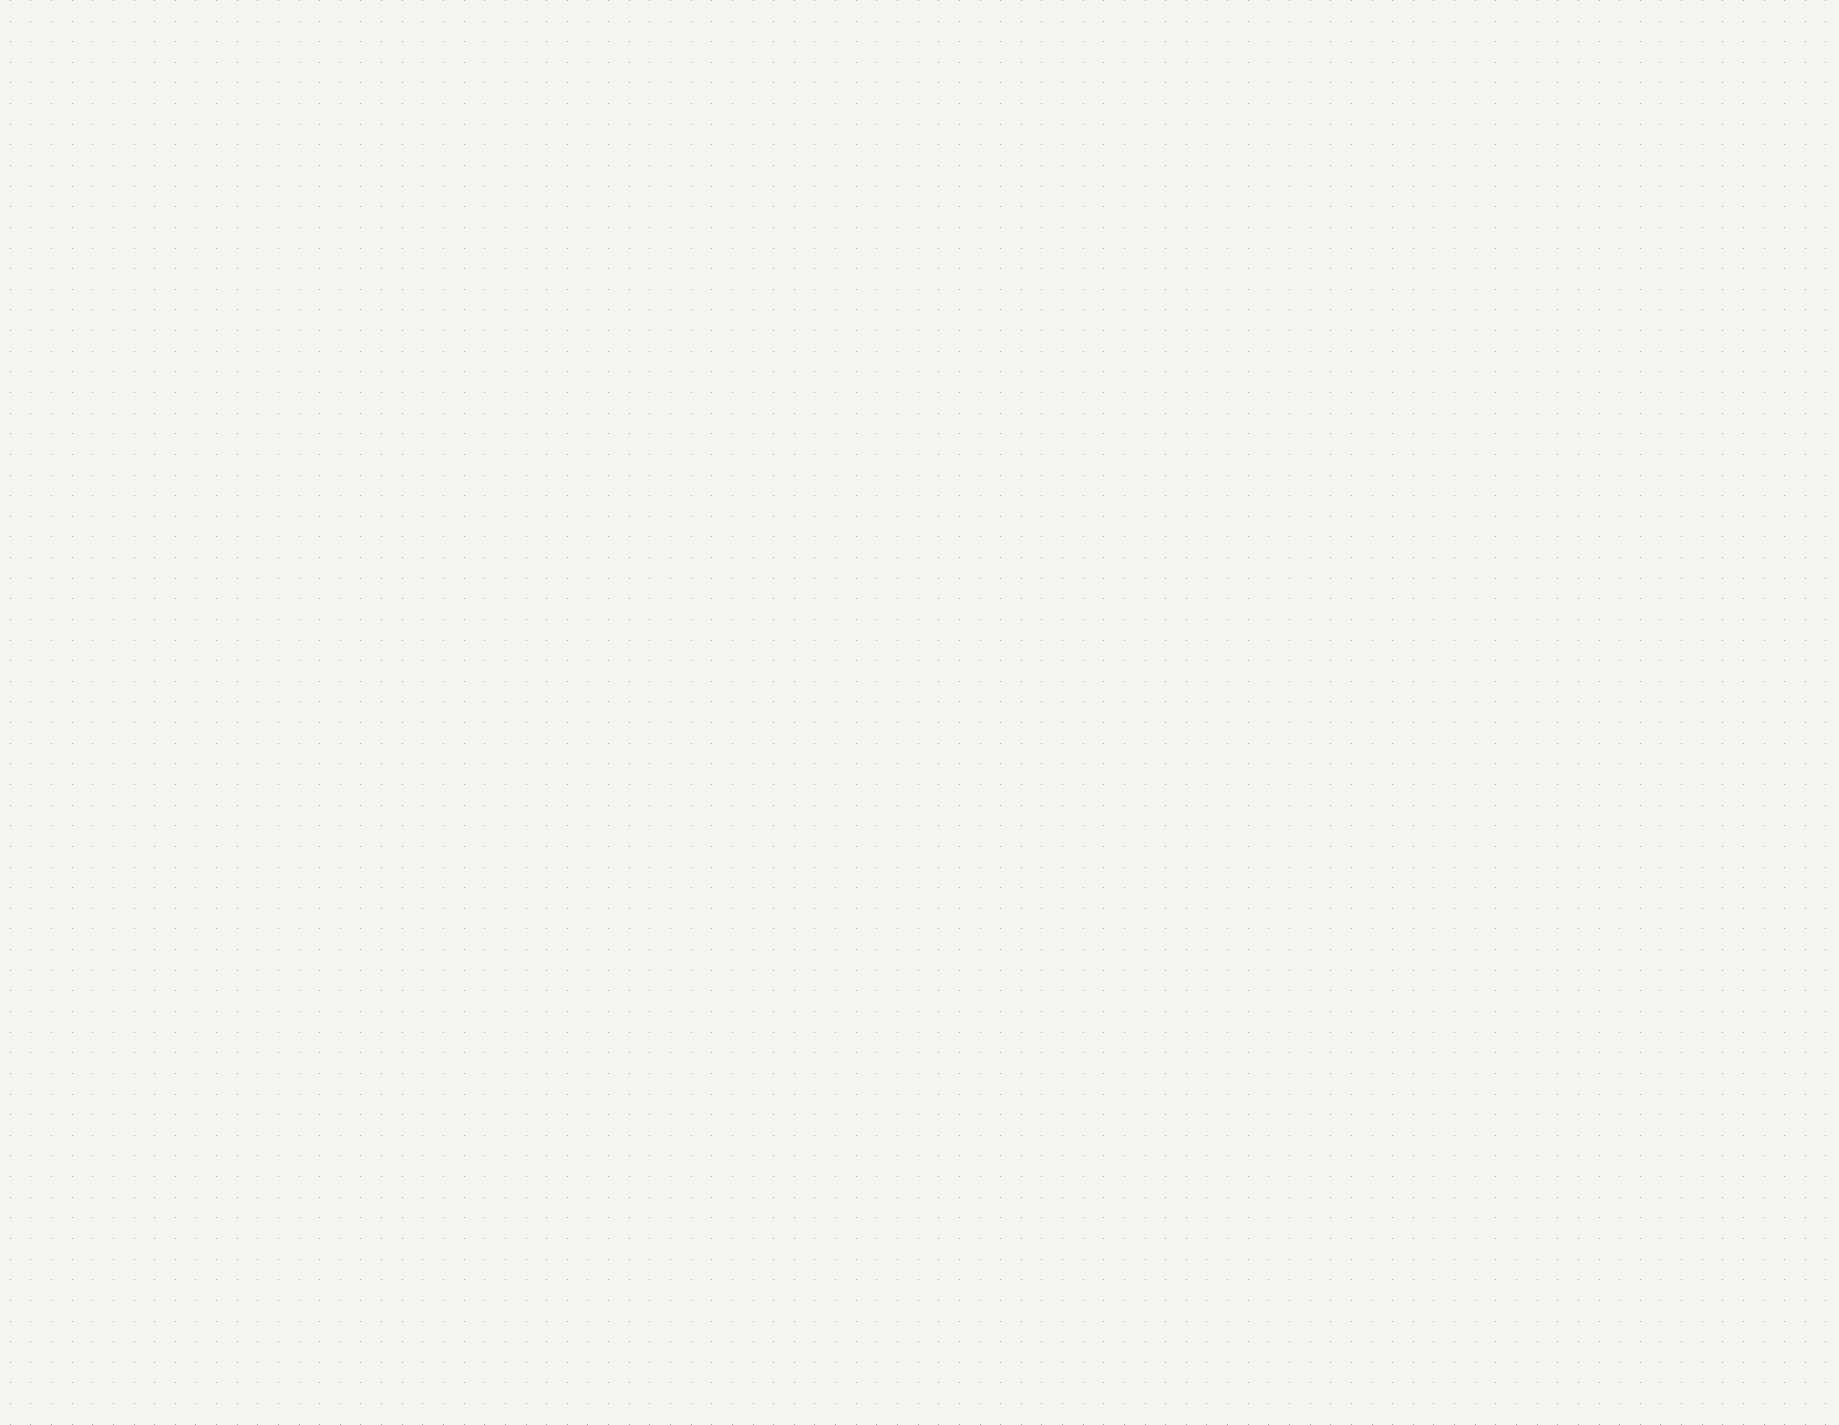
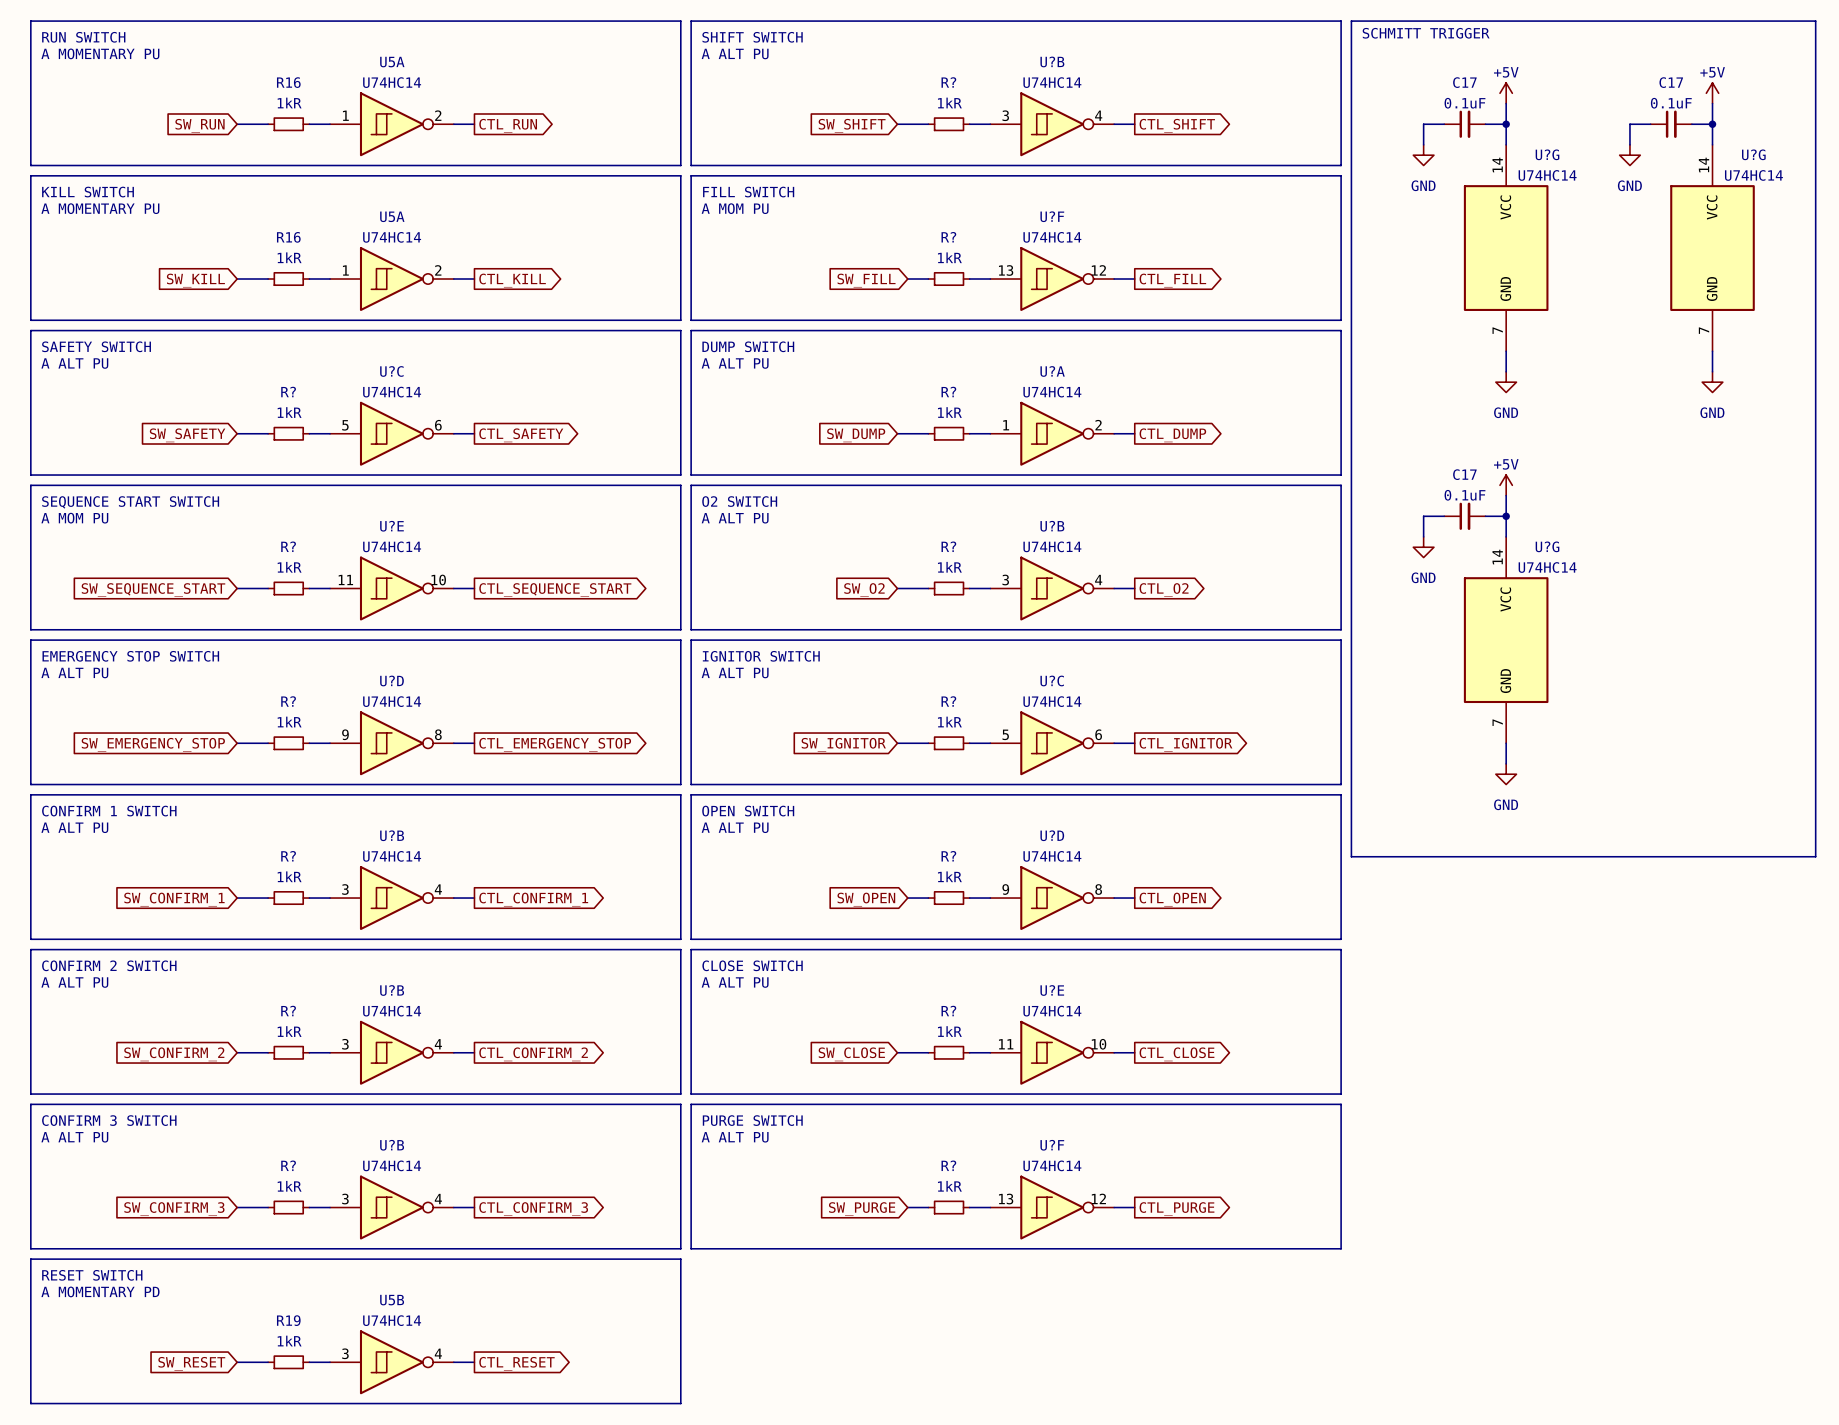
line: none -> (30, 21) (30, 165) (680, 165) (680, 21) (30, 21)
line: none -> (691, 21) (1341, 21) (1341, 165) (691, 165) (691, 21)
line: none -> (1351, 21) (1815, 21) (1815, 856) (1351, 856) (1351, 21)
text: none -> SCHMITT TRIGGER (1426, 33)
text: none -> RUN SWITCH (83, 37)
text: none -> SHIFT SWITCH (752, 37)
text: none -> A MOMENTARY PU (100, 53)
text: none -> A ALT PU (735, 53)
power symbol: none -> +5V (1506, 93)
power symbol: none -> +5V (1712, 93)
wire: none -> (1506, 103) (1506, 144)
wire: none -> (1712, 103) (1712, 144)
wire: none -> (237, 124) (268, 124)
R16: none -> 1kR (288, 124)
wire: none -> (309, 124) (330, 124)
U5A: none -> U74HC14 (391, 124)
wire: none -> (453, 124) (474, 124)
wire: none -> (897, 124) (928, 124)
R?: none -> 1kR (949, 124)
wire: none -> (969, 124) (990, 124)
U?B: none -> U74HC14 (1052, 124)
wire: none -> (1114, 124) (1134, 124)
wire: none -> (1444, 124) (1423, 124) (1423, 144)
C17: none -> 0.1uF (1464, 124)
wire: none -> (1485, 124) (1506, 124)
junction: none -> (1506, 124)
wire: none -> (1650, 124) (1629, 124) (1629, 144)
C17: none -> 0.1uF (1671, 124)
wire: none -> (1691, 124) (1712, 124)
junction: none -> (1712, 124)
global label: none -> SW_RUN (200, 125)
global label: none -> CTL_RUN (508, 125)
global label: none -> SW_SHIFT (852, 125)
global label: none -> CTL_SHIFT (1177, 125)
power symbol: none -> GND (1423, 155)
power symbol: none -> GND (1629, 155)
line: none -> (30, 175) (30, 320) (680, 320) (680, 175) (30, 175)
line: none -> (691, 175) (1341, 175) (1341, 320) (691, 320) (691, 175)
text: none -> KILL SWITCH (88, 192)
text: none -> FILL SWITCH (748, 192)
text: none -> A MOMENTARY PU (100, 208)
text: none -> A MOM PU (735, 208)
U?G: none -> U74HC14 (1506, 248)
U?G: none -> U74HC14 (1712, 248)
wire: none -> (237, 279) (268, 279)
R16: none -> 1kR (288, 279)
wire: none -> (309, 279) (330, 279)
U5A: none -> U74HC14 (391, 279)
wire: none -> (453, 279) (474, 279)
wire: none -> (907, 279) (928, 279)
R?: none -> 1kR (949, 279)
wire: none -> (969, 279) (990, 279)
U?F: none -> U74HC14 (1052, 279)
wire: none -> (1114, 279) (1134, 279)
global label: none -> SW_KILL (195, 280)
global label: none -> CTL_KILL (512, 280)
global label: none -> SW_FILL (866, 280)
global label: none -> CTL_FILL (1172, 280)
line: none -> (30, 330) (30, 475) (680, 475) (680, 330) (30, 330)
line: none -> (691, 330) (1341, 330) (1341, 475) (691, 475) (691, 330)
text: none -> SAFETY SWITCH (96, 346)
text: none -> DUMP SWITCH (748, 346)
wire: none -> (1506, 351) (1506, 371)
wire: none -> (1712, 351) (1712, 371)
text: none -> A ALT PU (74, 363)
text: none -> A ALT PU (735, 363)
power symbol: none -> GND (1506, 382)
power symbol: none -> GND (1712, 382)
wire: none -> (237, 433) (268, 433)
R?: none -> 1kR (288, 433)
wire: none -> (309, 433) (330, 433)
U?C: none -> U74HC14 (391, 433)
wire: none -> (453, 433) (474, 433)
wire: none -> (897, 433) (928, 433)
R?: none -> 1kR (949, 433)
wire: none -> (969, 433) (990, 433)
U?A: none -> U74HC14 (1052, 433)
wire: none -> (1114, 433) (1134, 433)
global label: none -> SW_SAFETY (187, 435)
global label: none -> CTL_SAFETY (521, 435)
global label: none -> SW_DUMP (856, 435)
global label: none -> CTL_DUMP (1172, 435)
line: none -> (30, 485) (30, 629) (680, 629) (680, 485) (30, 485)
line: none -> (691, 485) (1341, 485) (1341, 629) (691, 629) (691, 485)
power symbol: none -> +5V (1506, 485)
wire: none -> (1506, 495) (1506, 536)
text: none -> O2 SWITCH (739, 501)
text: none -> SEQUENCE START SWITCH (130, 502)
wire: none -> (1444, 516) (1423, 516) (1423, 536)
C17: none -> 0.1uF (1464, 516)
wire: none -> (1485, 516) (1506, 516)
junction: none -> (1506, 516)
text: none -> A MOM PU (74, 518)
text: none -> A ALT PU (735, 518)
power symbol: none -> GND (1423, 547)
wire: none -> (237, 588) (268, 588)
R?: none -> 1kR (288, 588)
wire: none -> (309, 588) (330, 588)
U?E: none -> U74HC14 (391, 588)
wire: none -> (453, 588) (474, 588)
wire: none -> (897, 588) (928, 588)
R?: none -> 1kR (949, 588)
wire: none -> (969, 588) (990, 588)
U?B: none -> U74HC14 (1052, 588)
wire: none -> (1114, 588) (1134, 588)
global label: none -> SW_SEQUENCE_START (153, 590)
global label: none -> CTL_SEQUENCE_START (555, 590)
global label: none -> SW_O2 (864, 590)
global label: none -> CTL_O2 (1164, 590)
line: none -> (30, 640) (30, 784) (680, 784) (680, 640) (30, 640)
line: none -> (691, 640) (691, 784) (1341, 784) (1341, 640) (691, 640)
U?G: none -> U74HC14 (1506, 640)
text: none -> EMERGENCY STOP SWITCH (130, 656)
text: none -> IGNITOR SWITCH (761, 656)
text: none -> A ALT PU (74, 673)
text: none -> A ALT PU (735, 673)
wire: none -> (237, 743) (268, 743)
R?: none -> 1kR (288, 743)
wire: none -> (309, 743) (330, 743)
U?D: none -> U74HC14 (391, 743)
wire: none -> (453, 743) (474, 743)
wire: none -> (897, 743) (928, 743)
R?: none -> 1kR (949, 743)
wire: none -> (969, 743) (990, 743)
U?C: none -> U74HC14 (1052, 743)
wire: none -> (1114, 743) (1134, 743)
wire: none -> (1506, 743) (1506, 763)
global label: none -> SW_EMERGENCY_STOP (153, 744)
global label: none -> CTL_EMERGENCY_STOP (555, 744)
global label: none -> SW_IGNITOR (843, 744)
global label: none -> CTL_IGNITOR (1185, 744)
power symbol: none -> GND (1506, 774)
line: none -> (30, 794) (30, 939) (680, 939) (680, 794) (30, 794)
line: none -> (691, 794) (691, 939) (1341, 939) (1341, 794) (691, 794)
text: none -> CONFIRM 1 SWITCH (109, 811)
text: none -> OPEN SWITCH (748, 811)
text: none -> A ALT PU (74, 827)
text: none -> A ALT PU (735, 827)
wire: none -> (237, 898) (268, 898)
R?: none -> 1kR (288, 898)
wire: none -> (309, 898) (330, 898)
U?B: none -> U74HC14 (391, 898)
wire: none -> (453, 898) (474, 898)
wire: none -> (907, 898) (928, 898)
R?: none -> 1kR (949, 898)
wire: none -> (969, 898) (990, 898)
U?D: none -> U74HC14 (1052, 898)
wire: none -> (1114, 898) (1134, 898)
global label: none -> SW_CONFIRM_1 (174, 899)
global label: none -> CTL_CONFIRM_1 (533, 899)
global label: none -> SW_OPEN (866, 899)
global label: none -> CTL_OPEN (1172, 899)
line: none -> (30, 949) (680, 949) (680, 1094) (30, 1094) (30, 949)
line: none -> (691, 949) (1341, 949) (1341, 1094) (691, 1094) (691, 949)
text: none -> CONFIRM 2 SWITCH (109, 965)
text: none -> CLOSE SWITCH (752, 965)
text: none -> A ALT PU (74, 982)
text: none -> A ALT PU (735, 982)
wire: none -> (237, 1052) (268, 1052)
R?: none -> 1kR (288, 1052)
wire: none -> (309, 1052) (330, 1052)
U?B: none -> U74HC14 (391, 1052)
wire: none -> (453, 1052) (474, 1052)
wire: none -> (897, 1052) (928, 1052)
R?: none -> 1kR (949, 1052)
wire: none -> (969, 1052) (990, 1052)
U?E: none -> U74HC14 (1052, 1052)
wire: none -> (1114, 1052) (1134, 1052)
global label: none -> SW_CONFIRM_2 (174, 1054)
global label: none -> CTL_CONFIRM_2 (533, 1054)
global label: none -> SW_CLOSE (851, 1054)
global label: none -> CTL_CLOSE (1176, 1054)
line: none -> (30, 1104) (30, 1248) (680, 1248) (680, 1104) (30, 1104)
line: none -> (691, 1104) (1341, 1104) (1341, 1248) (691, 1248) (691, 1104)
text: none -> CONFIRM 3 SWITCH (109, 1120)
text: none -> PURGE SWITCH (752, 1120)
text: none -> A ALT PU (74, 1137)
text: none -> A ALT PU (735, 1137)
wire: none -> (237, 1207) (268, 1207)
R?: none -> 1kR (288, 1207)
wire: none -> (309, 1207) (330, 1207)
U?B: none -> U74HC14 (391, 1207)
wire: none -> (453, 1207) (474, 1207)
wire: none -> (907, 1207) (928, 1207)
R?: none -> 1kR (949, 1207)
wire: none -> (969, 1207) (990, 1207)
U?F: none -> U74HC14 (1052, 1207)
wire: none -> (1114, 1207) (1134, 1207)
global label: none -> SW_CONFIRM_3 (174, 1209)
global label: none -> CTL_CONFIRM_3 (533, 1209)
global label: none -> SW_PURGE (862, 1209)
global label: none -> CTL_PURGE (1176, 1209)
line: none -> (30, 1259) (30, 1403) (680, 1403) (680, 1259) (30, 1259)
text: none -> RESET SWITCH (92, 1275)
text: none -> A MOMENTARY PD (100, 1291)
wire: none -> (237, 1362) (268, 1362)
R19: none -> 1kR (288, 1362)
wire: none -> (309, 1362) (330, 1362)
U5B: none -> U74HC14 (391, 1362)
wire: none -> (453, 1362) (474, 1362)
global label: none -> SW_RESET (191, 1363)
global label: none -> CTL_RESET (516, 1363)

